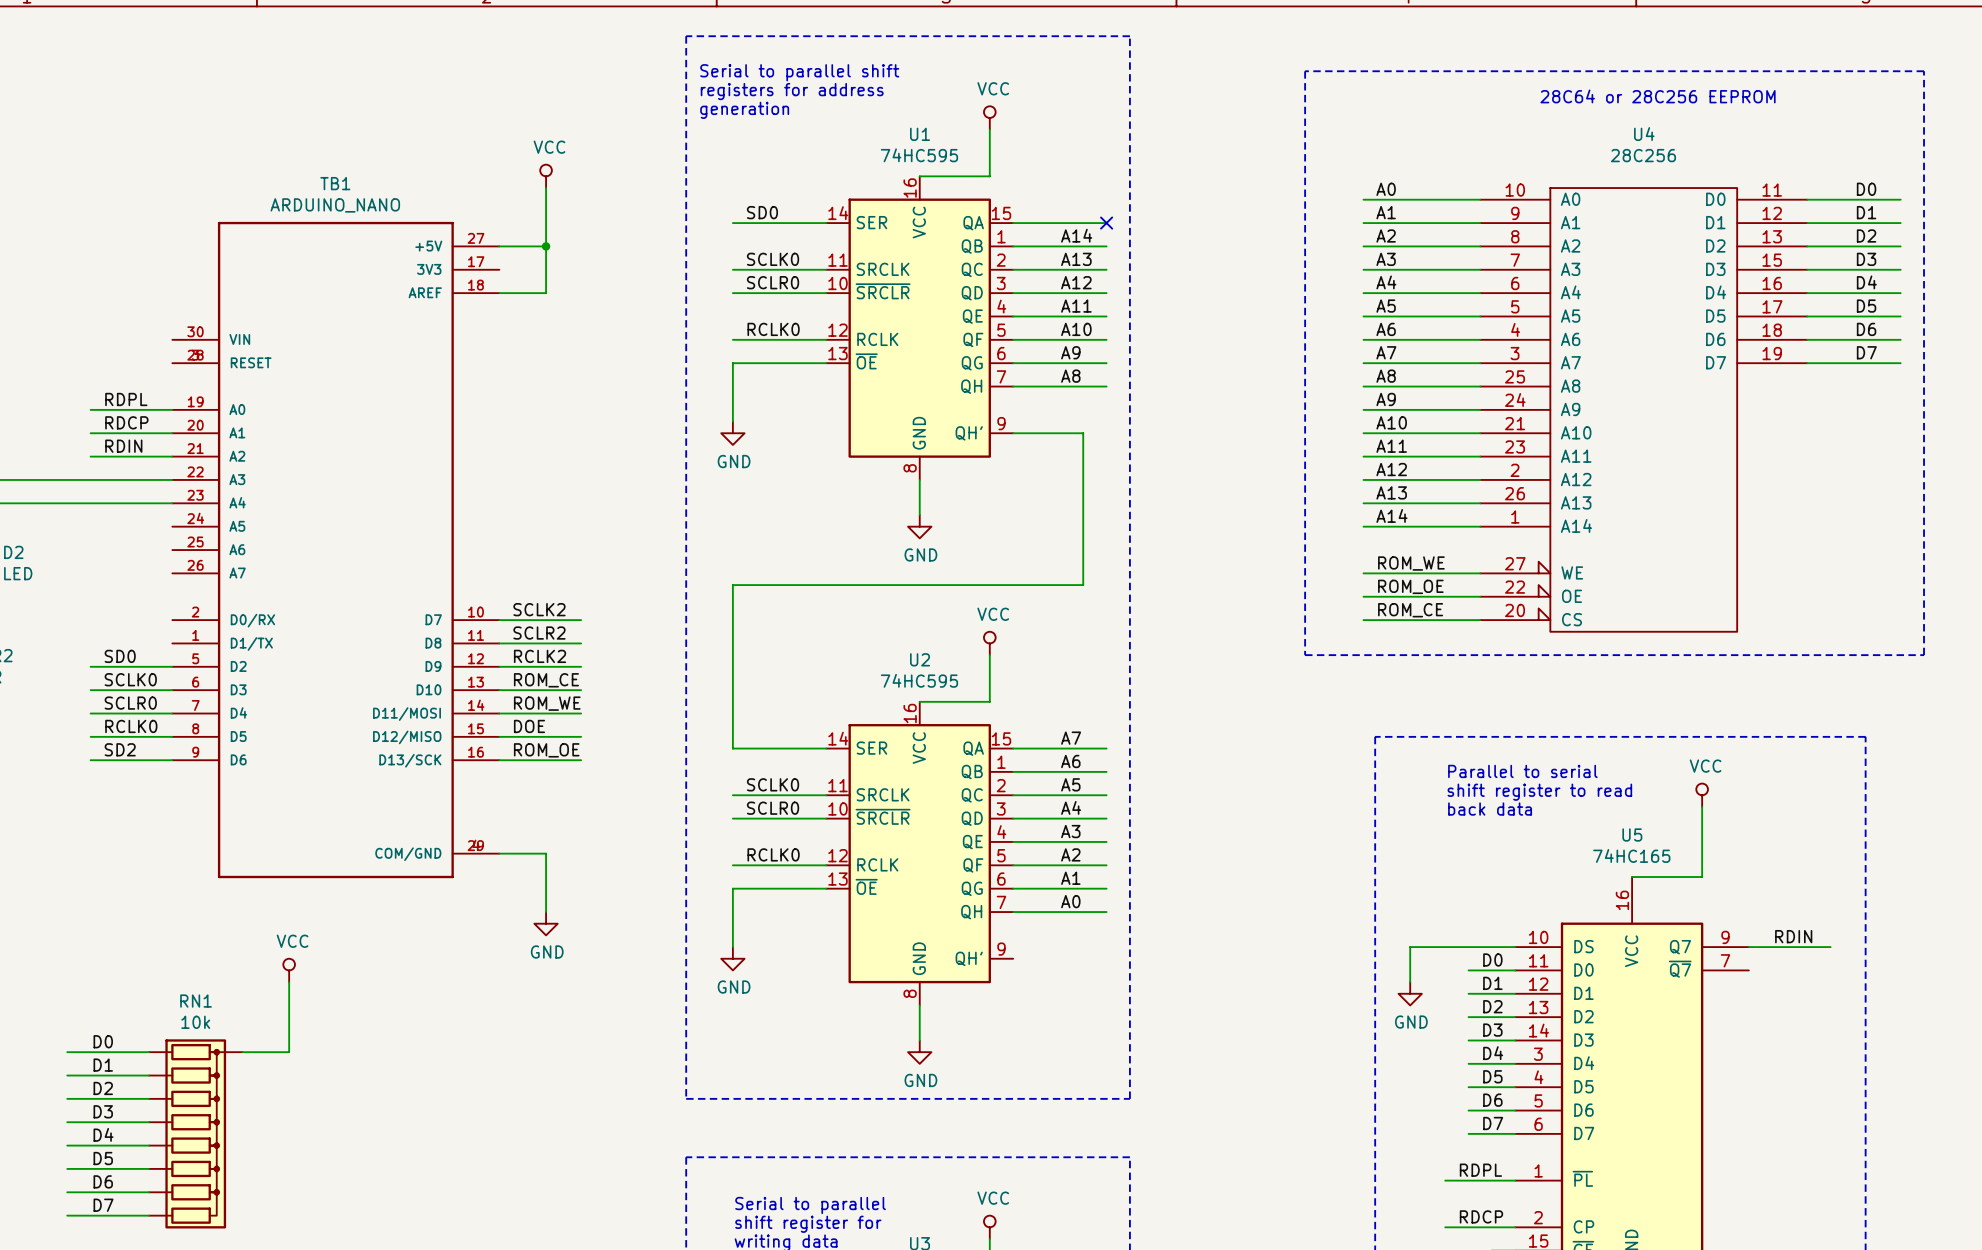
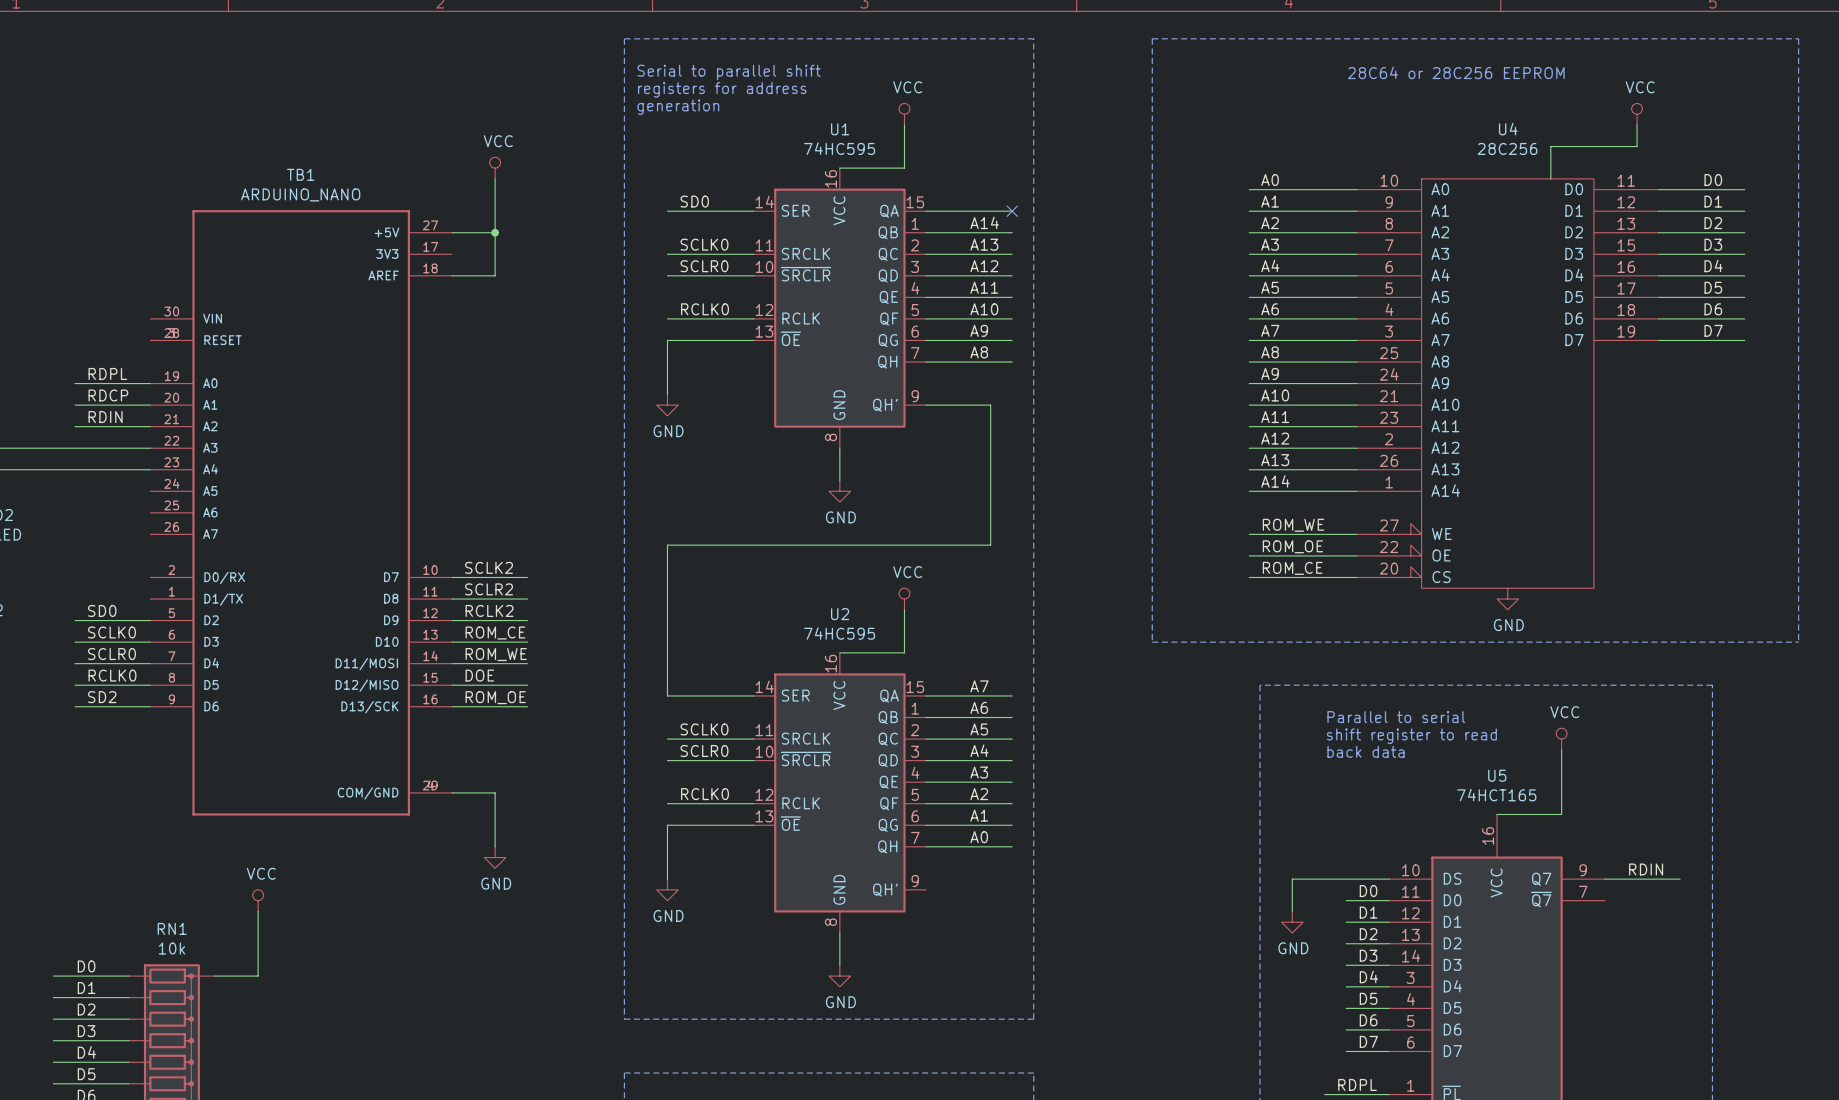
line: (1305, 71) (1305, 655) (1924, 655) (1924, 71) (1305, 71) -> (1152, 38) (1152, 642) (1798, 642) (1798, 38) (1152, 38)
text position: 28C64 or 28C256 EEPROM (1658, 96) -> 28C64 or 28C256 EEPROM (1456, 72)
power symbol: none -> VCC (1637, 114)
wire: none -> (1637, 125) (1637, 146) (1550, 146) (1550, 178)
power symbol: none -> GND (1507, 599)
U5 value: 74HC165 (1631, 855) -> 74HCT165 (1496, 795)

